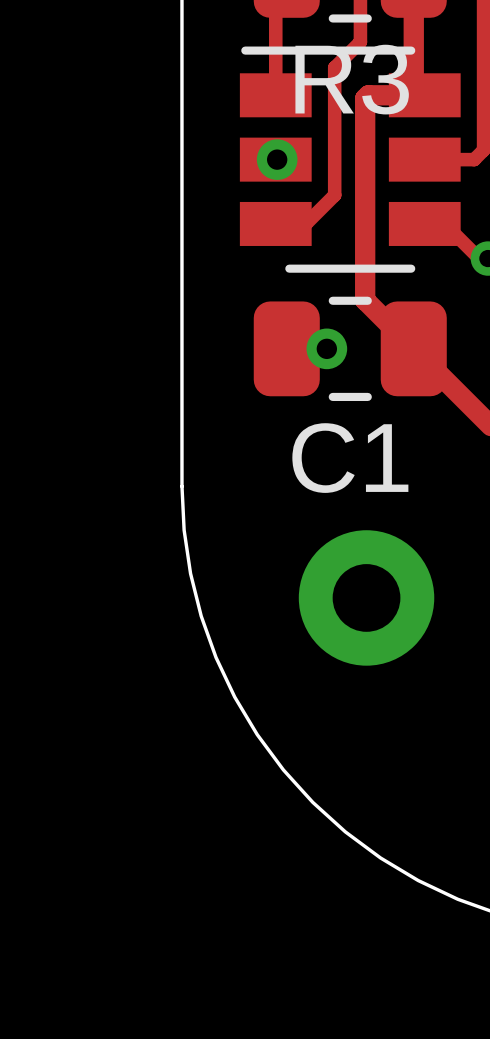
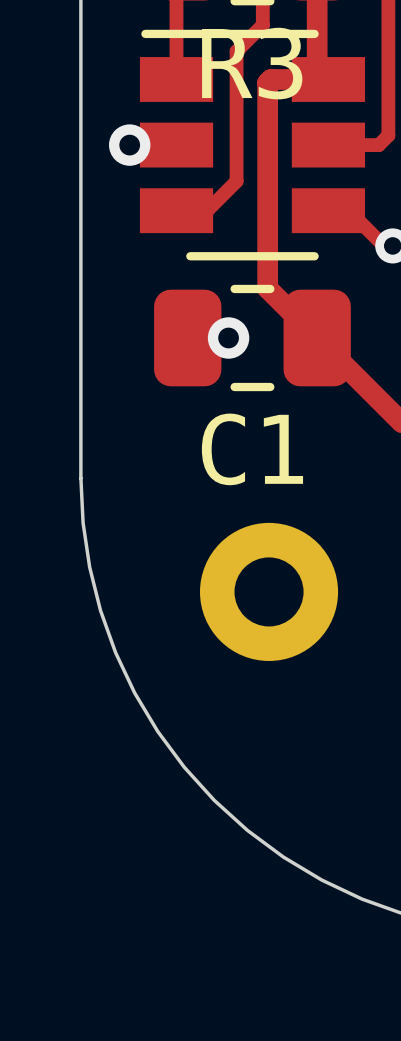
via position: (277, 159) -> (129, 145)

